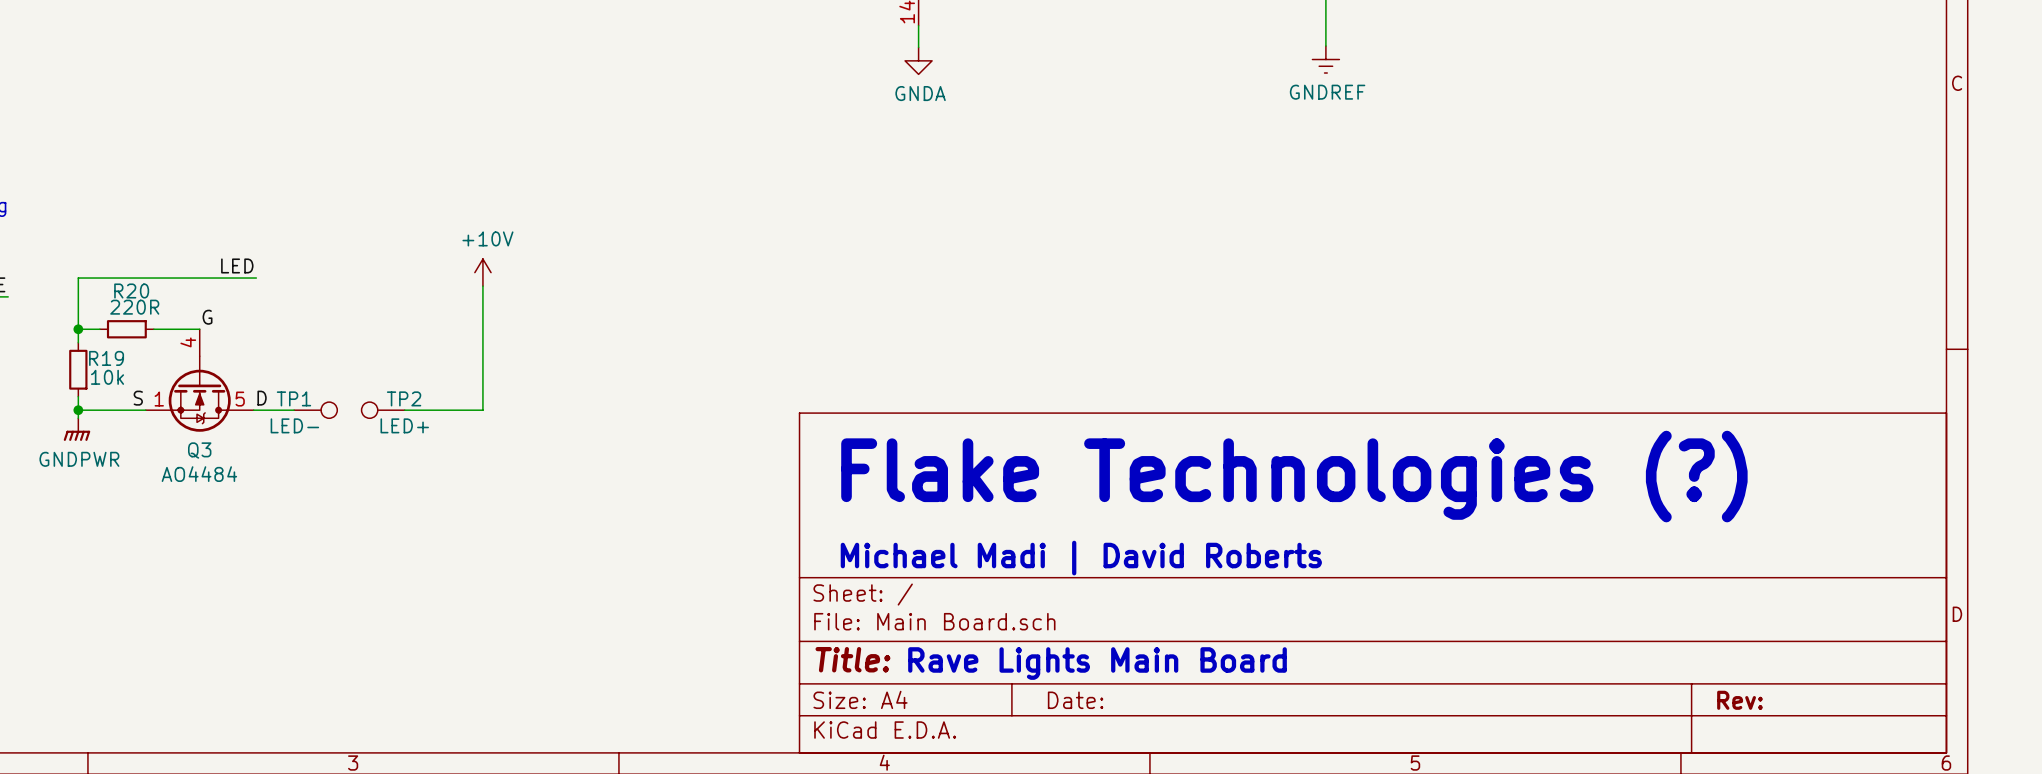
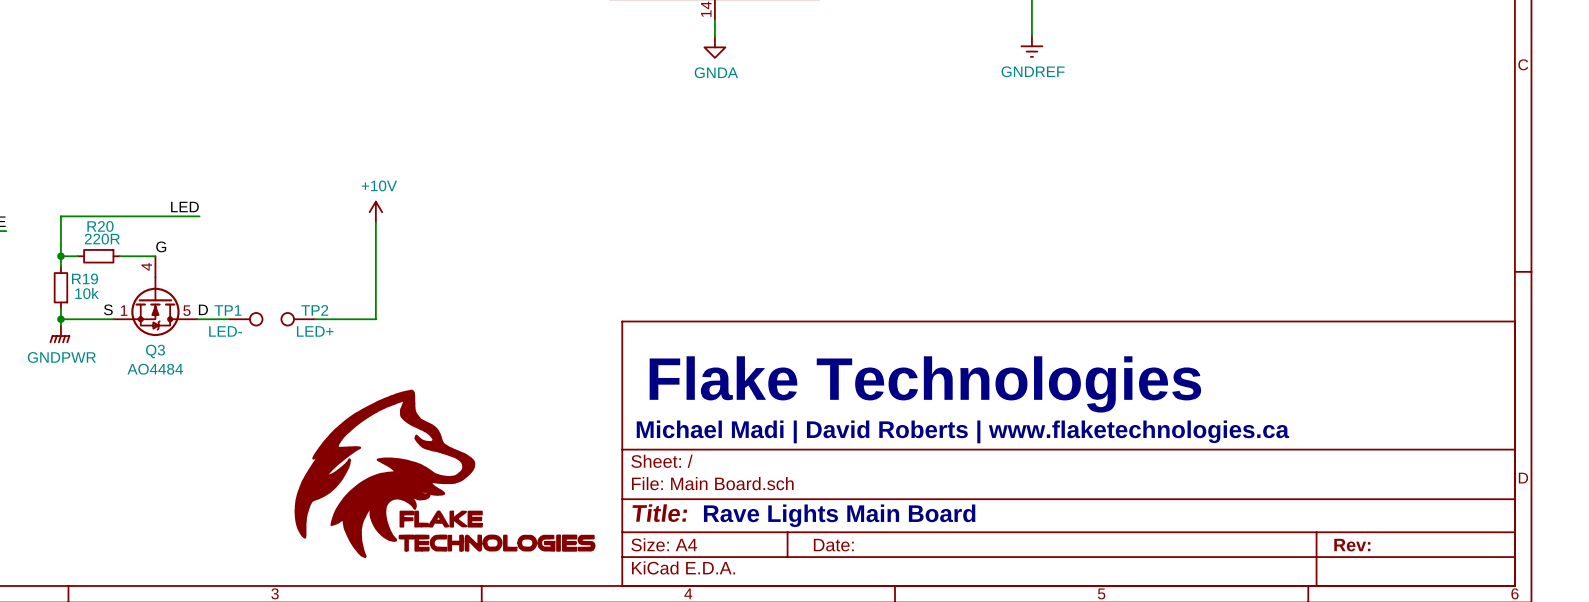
text: Flake Technologies (?) (1294, 476) -> Flake Technologies (925, 384)
text: Michael Madi | David Roberts (1081, 558) -> Michael Madi | David Roberts | www.flaketechnologies.ca (962, 431)
power symbol: none -> (445, 473)

